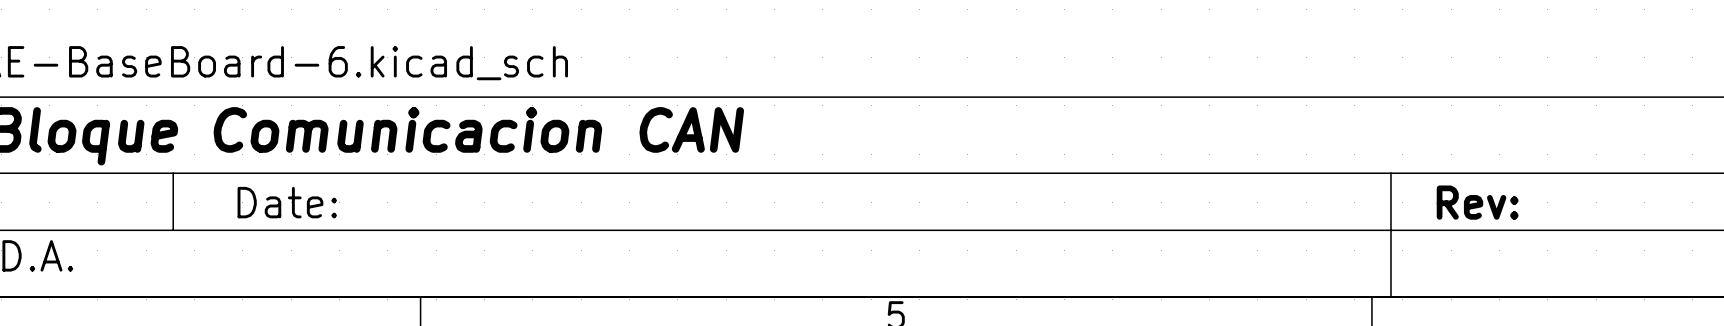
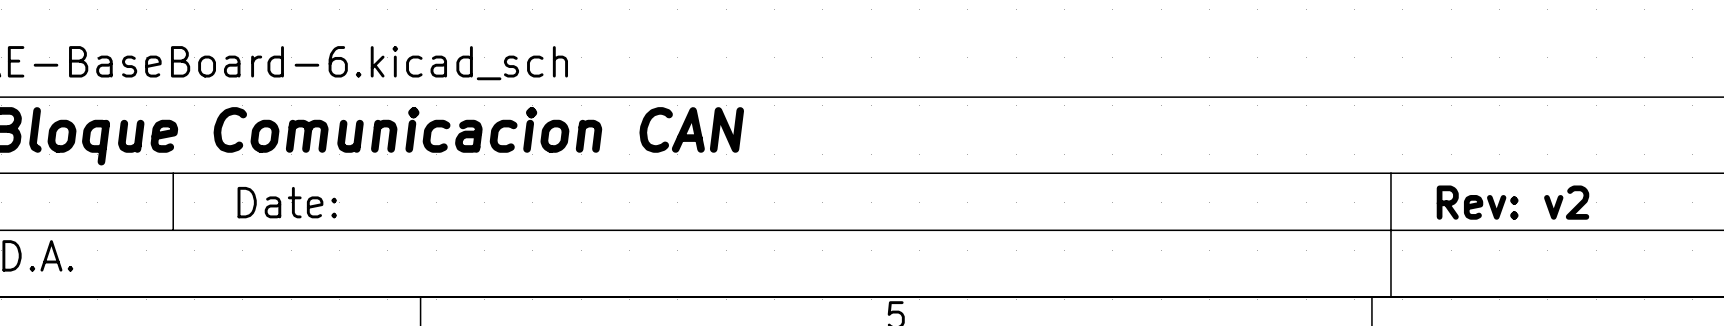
title block: Rev: (1477, 202) -> Rev: v2 (1512, 202)

